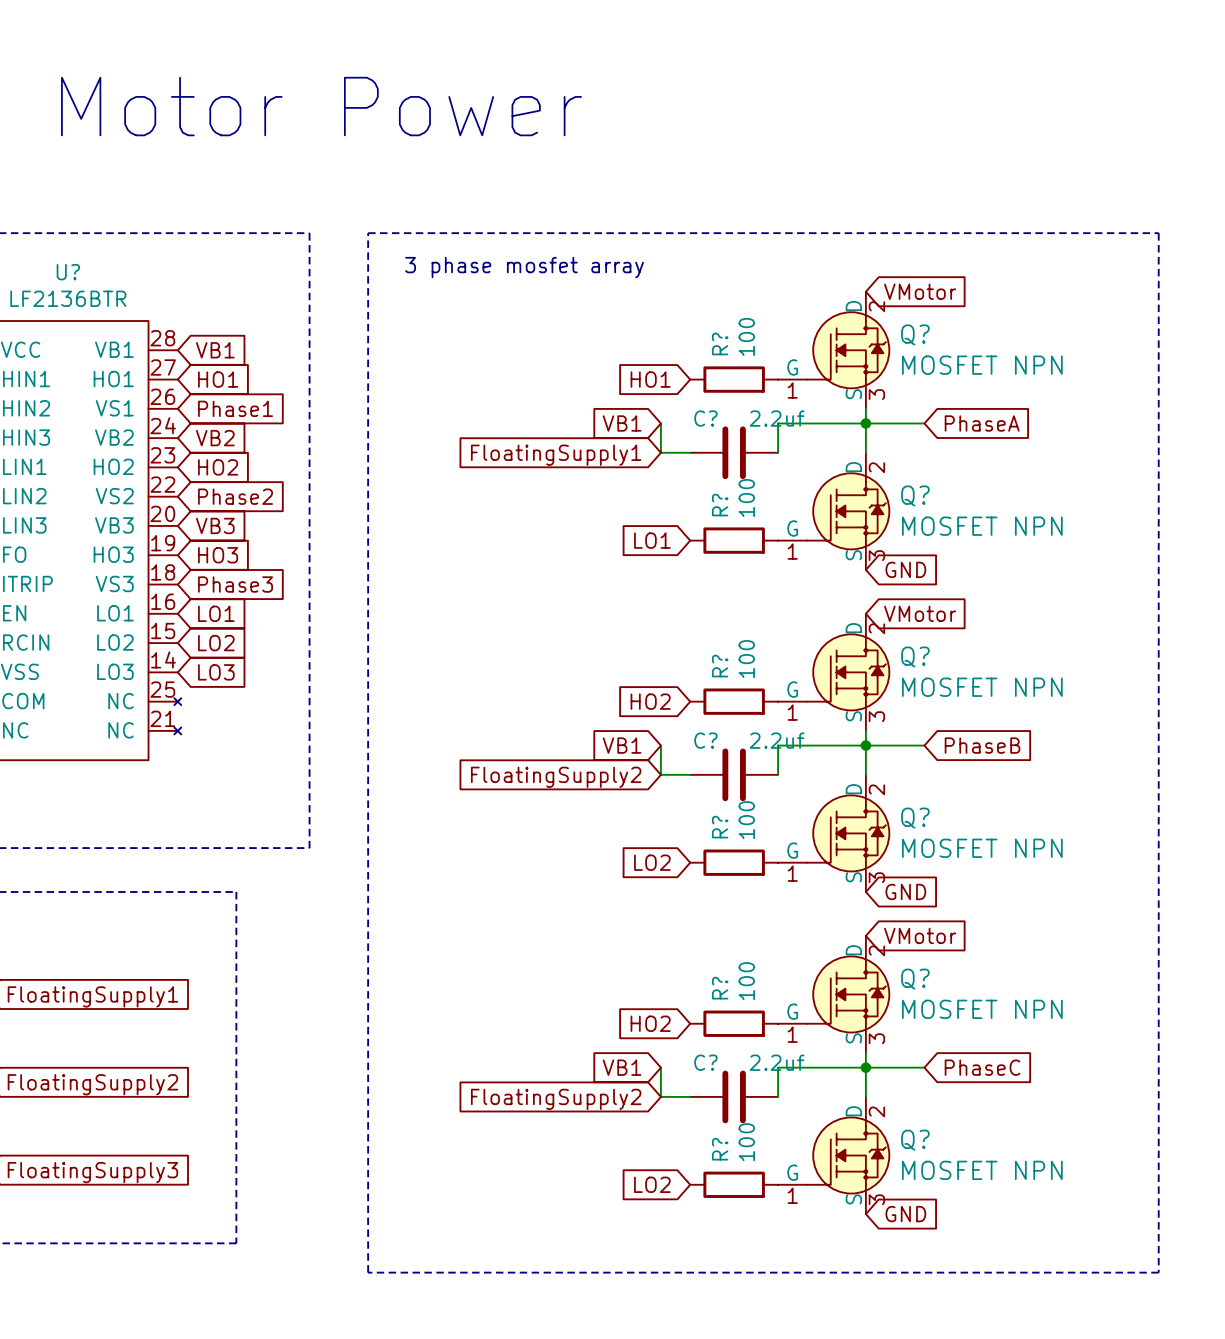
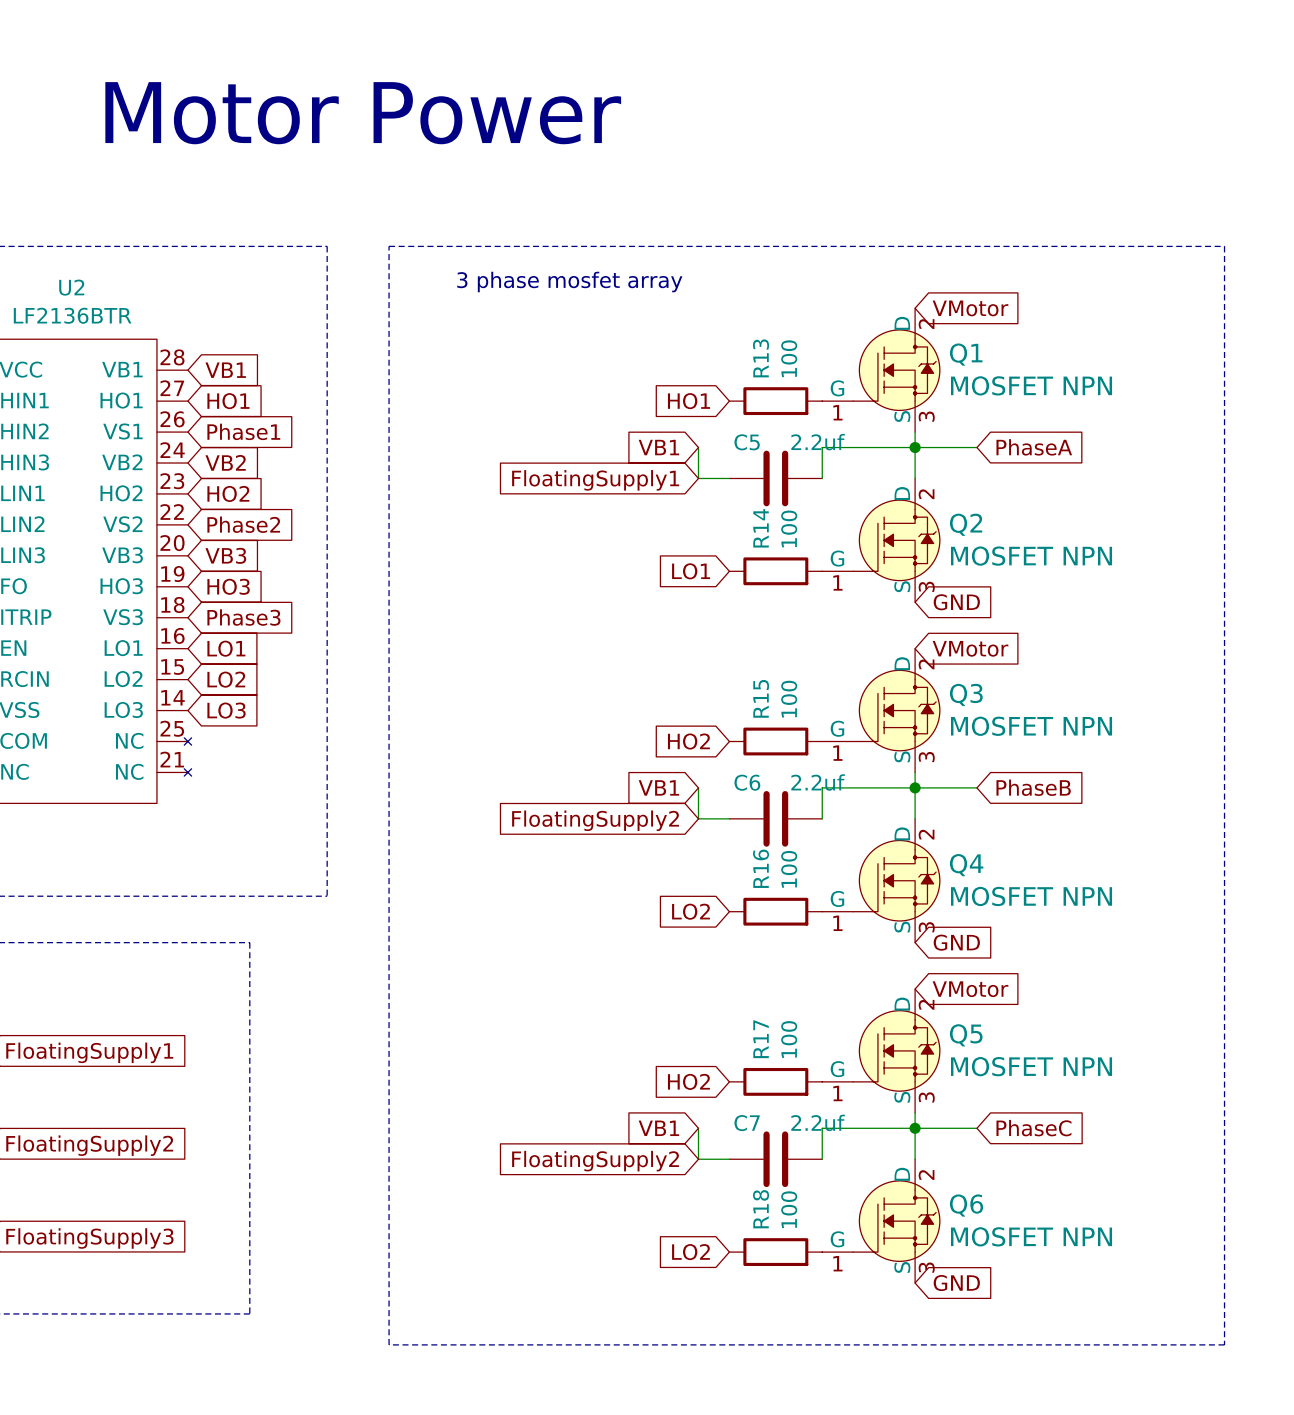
U? name: U? (68, 272) -> U2 (71, 287)
Q? name: Q? (915, 334) -> Q1 (966, 354)
R? name: R? (720, 343) -> R13 (761, 358)
C? name: C? (705, 418) -> C5 (747, 442)
Q? name: Q? (915, 495) -> Q2 (966, 524)
R? name: R? (720, 505) -> R14 (761, 528)
Q? name: Q? (915, 657) -> Q3 (966, 694)
R? name: R? (720, 666) -> R15 (761, 698)
C? name: C? (705, 740) -> C6 (747, 782)
Q? name: Q? (915, 818) -> Q4 (966, 865)
R? name: R? (720, 827) -> R16 (761, 868)
Q? name: Q? (915, 979) -> Q5 (966, 1035)
R? name: R? (720, 988) -> R17 (761, 1039)
C? name: C? (705, 1062) -> C7 (747, 1123)
Q? name: Q? (915, 1140) -> Q6 (966, 1205)
R? name: R? (720, 1149) -> R18 (761, 1209)

